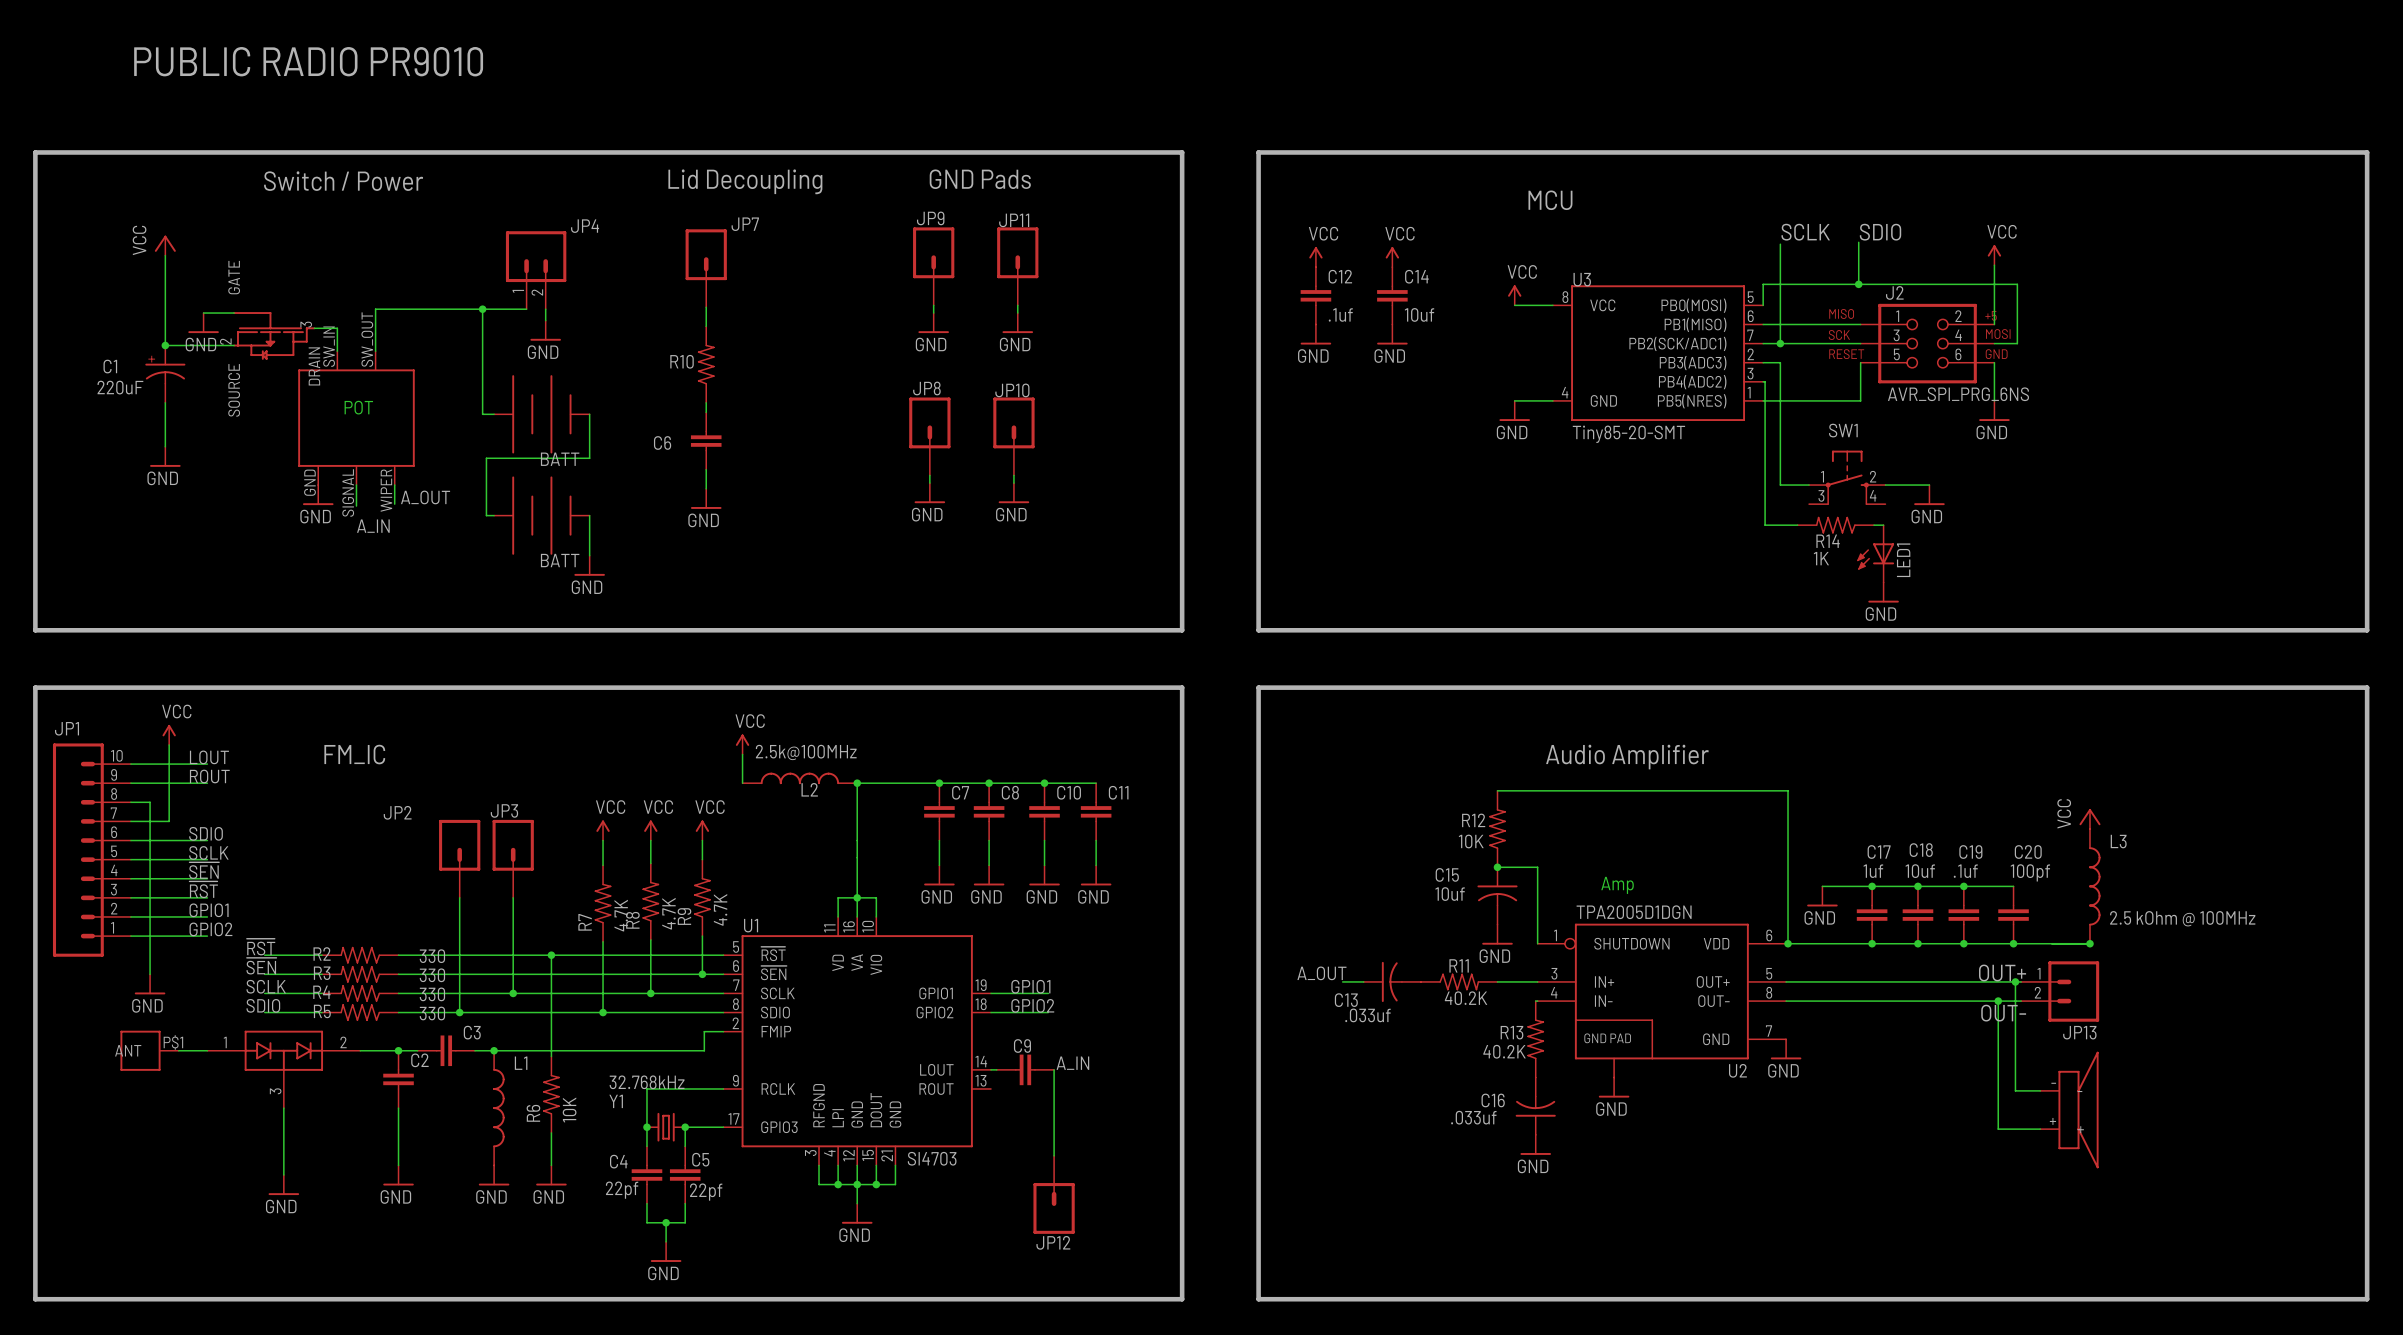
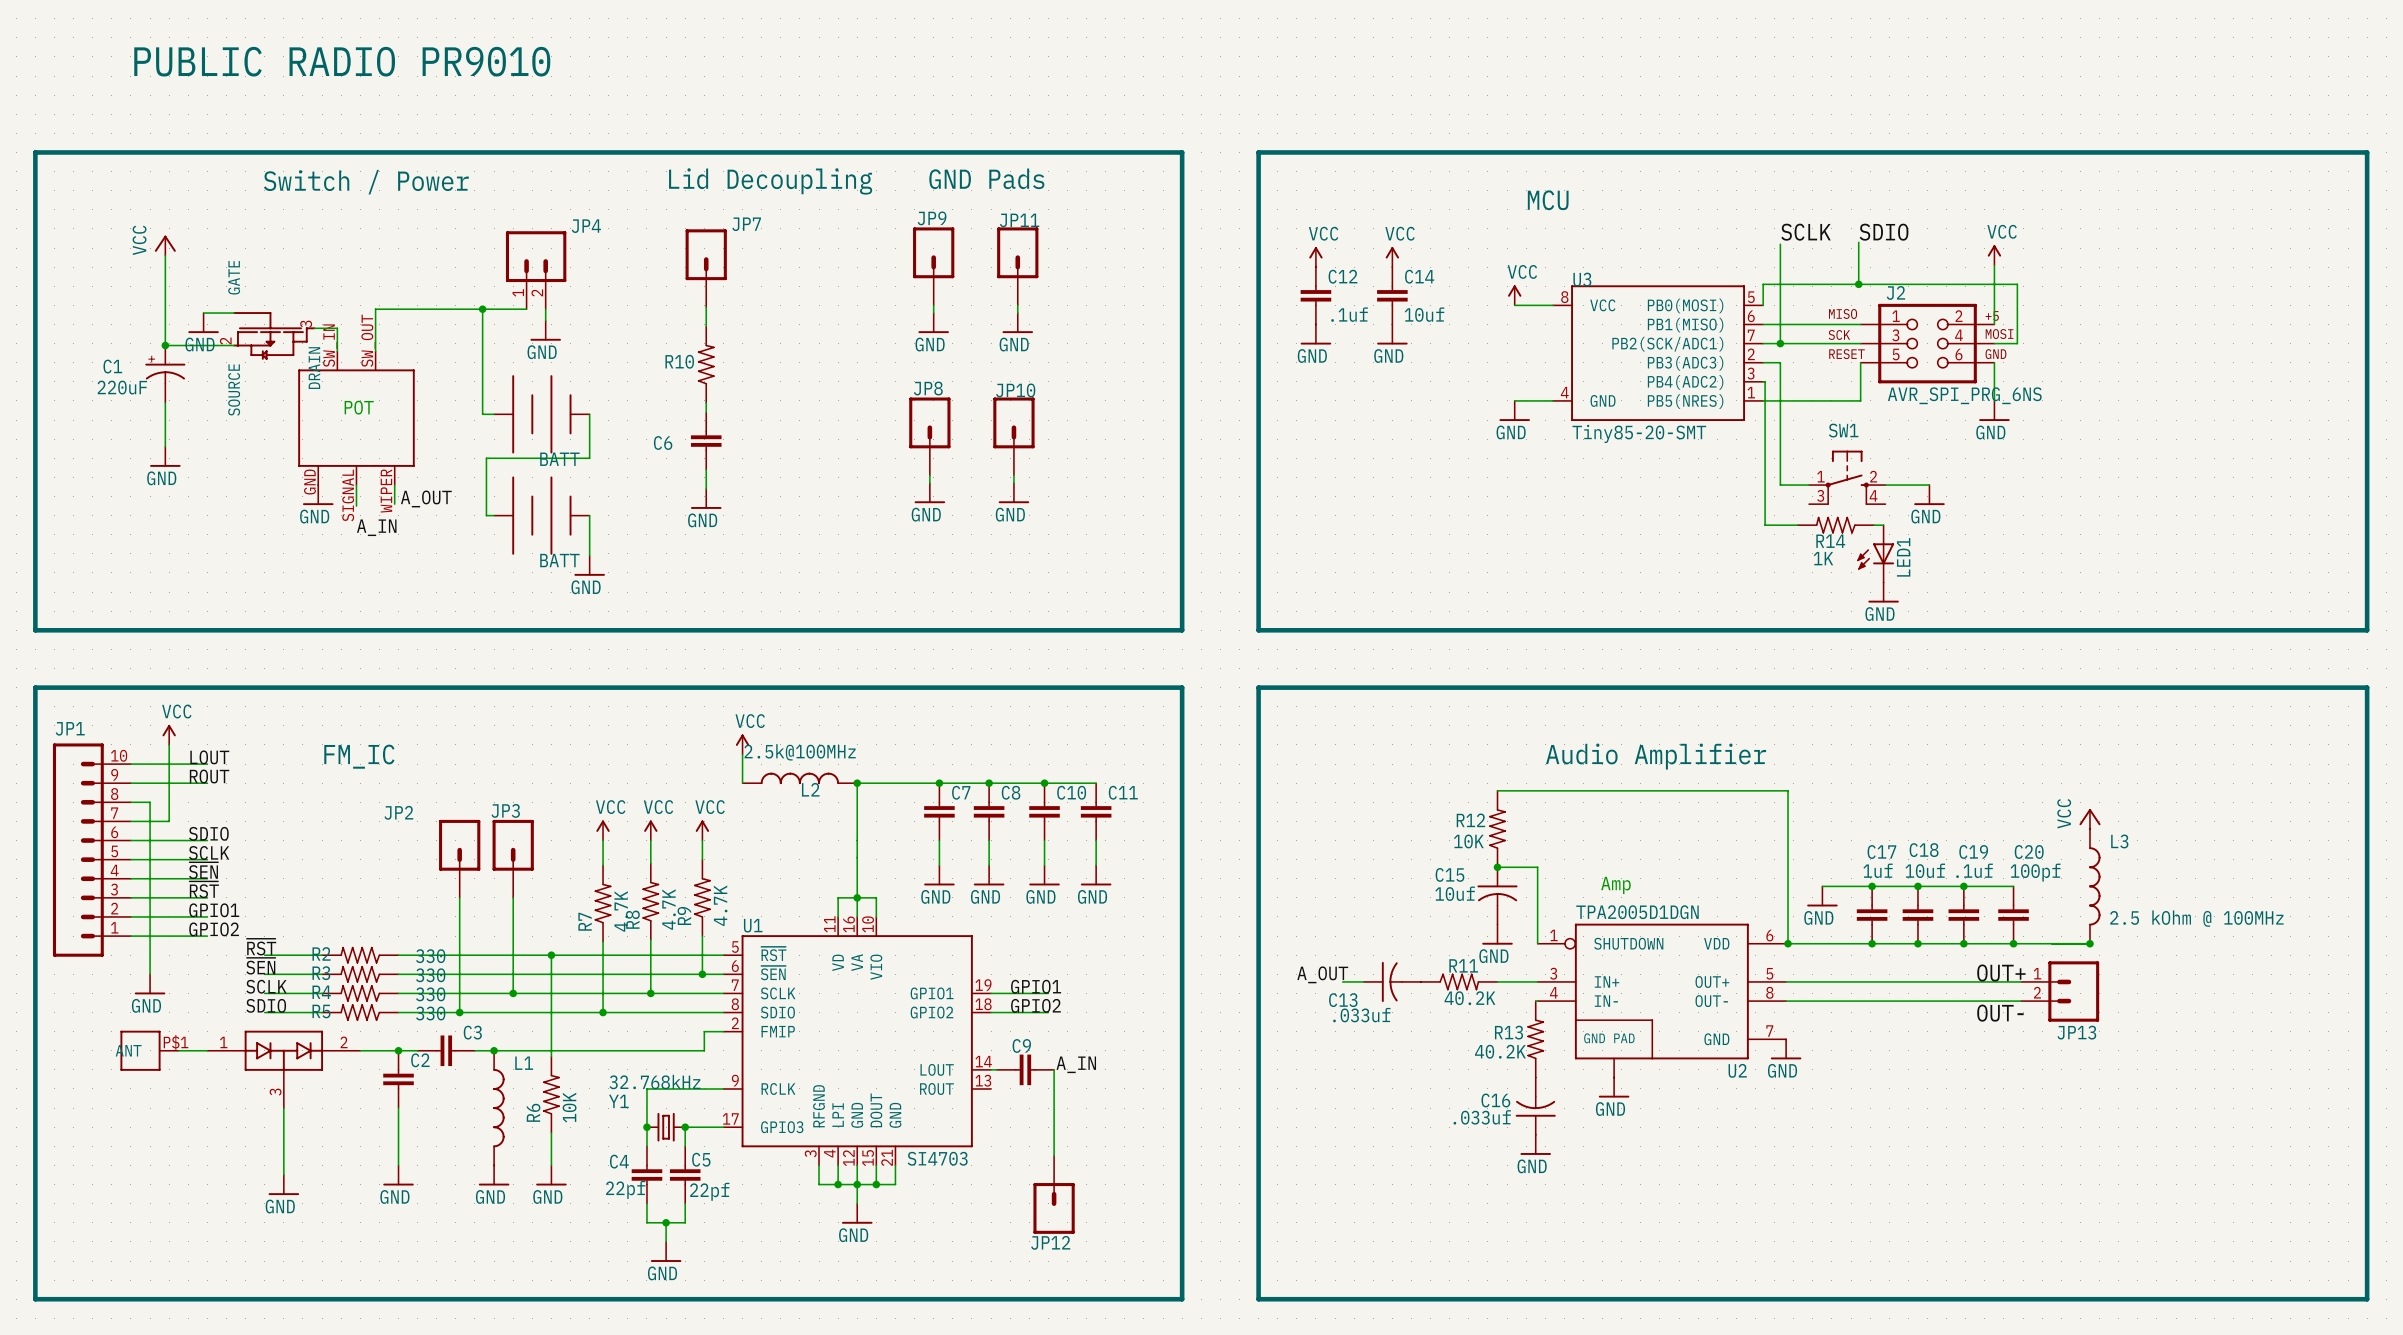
wire: (2015, 981) (2015, 1090) (2040, 1090) -> none
junction: (2015, 981) -> none
wire: (1998, 1001) (1998, 1129) (2040, 1129) -> none
junction: (1998, 1001) -> none
part: (2069, 1110) -> none

